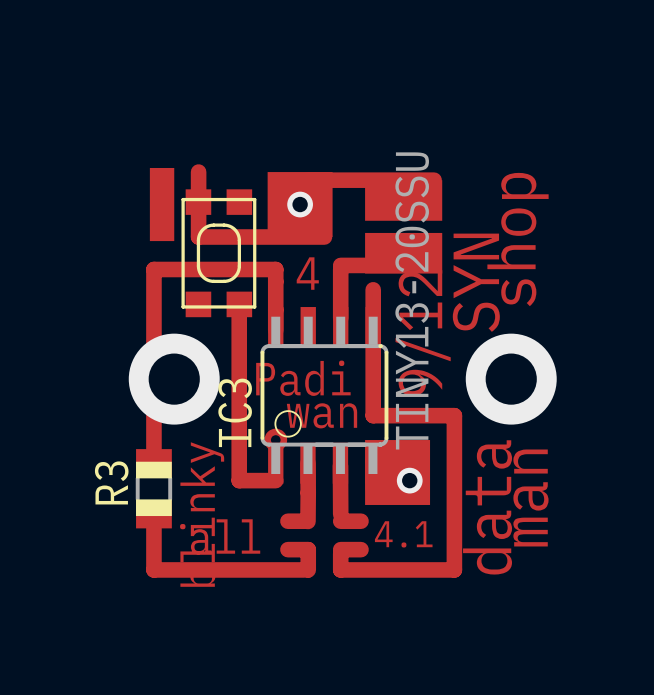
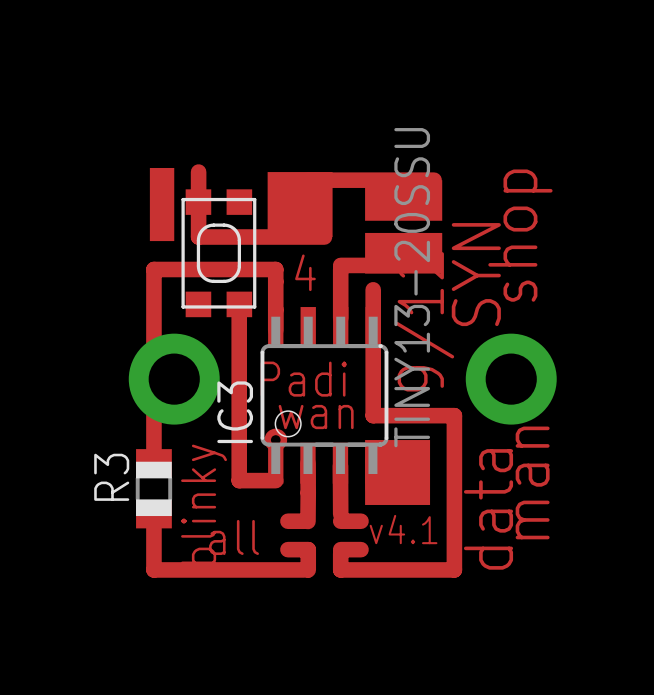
via: (300, 204) -> none
via: (409, 480) -> none
text: 4.1 (403, 534) -> v4.1 (403, 529)

